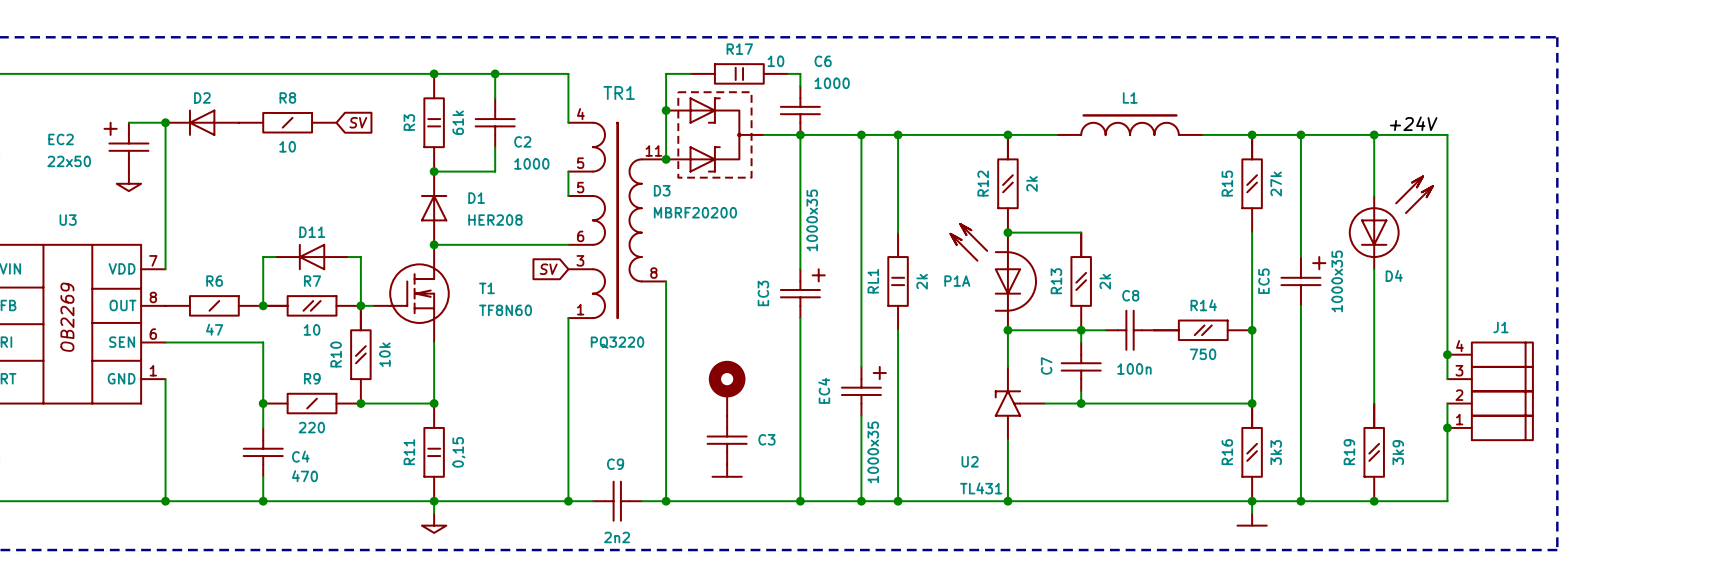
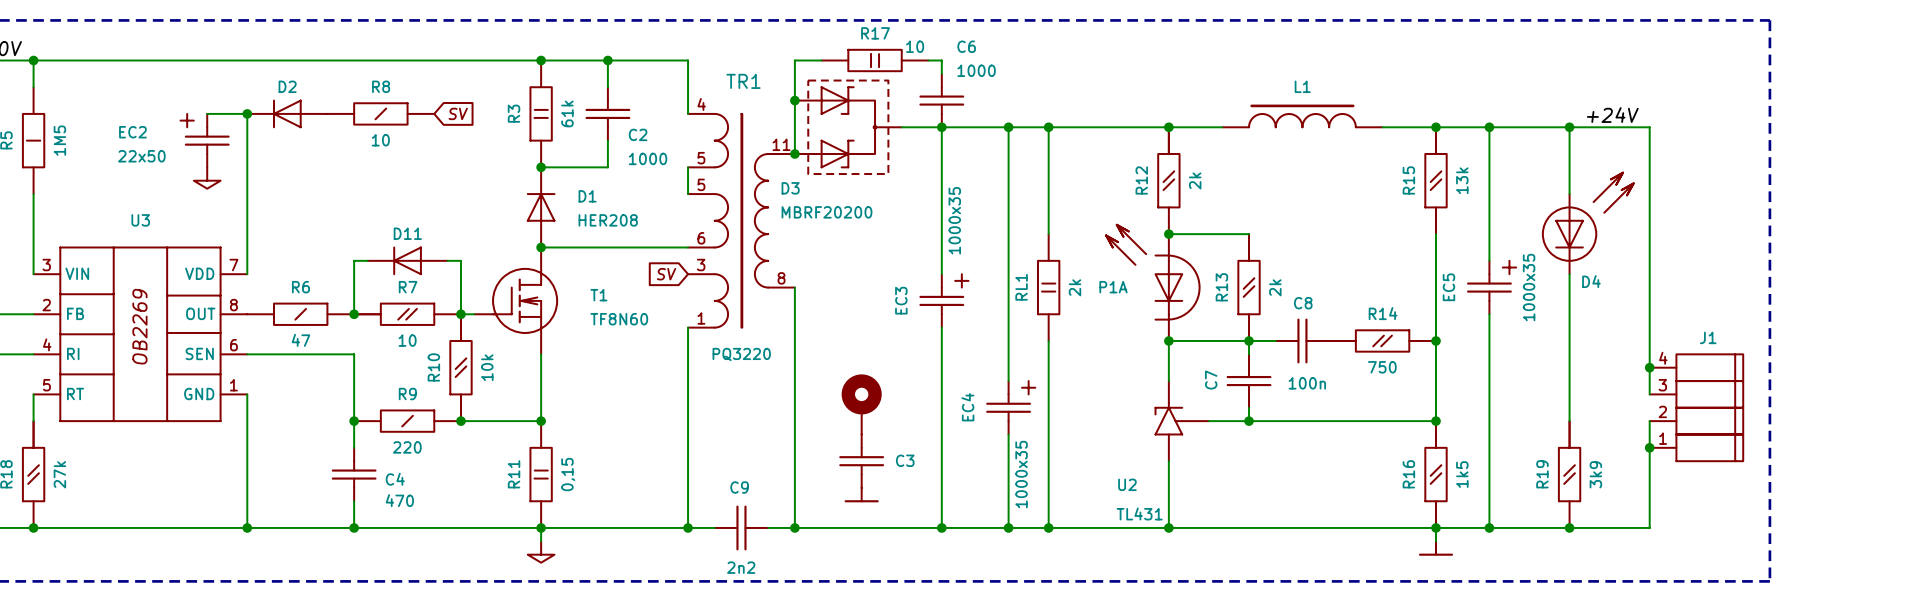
R15 value: 27k (1276, 184) -> 13k (1462, 180)
R16 value: 3k3 (1276, 452) -> 1k5 (1462, 474)

